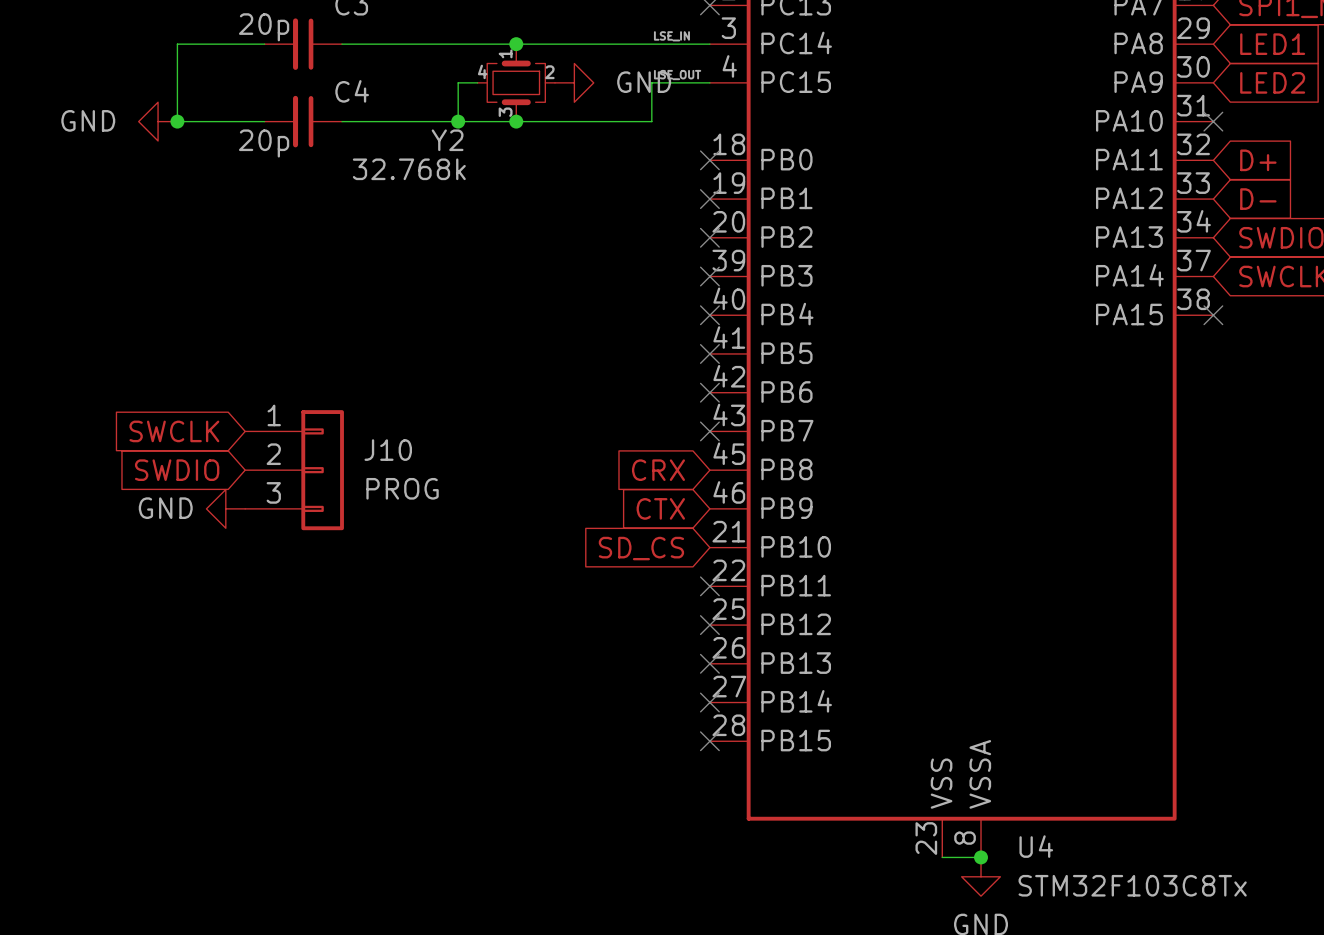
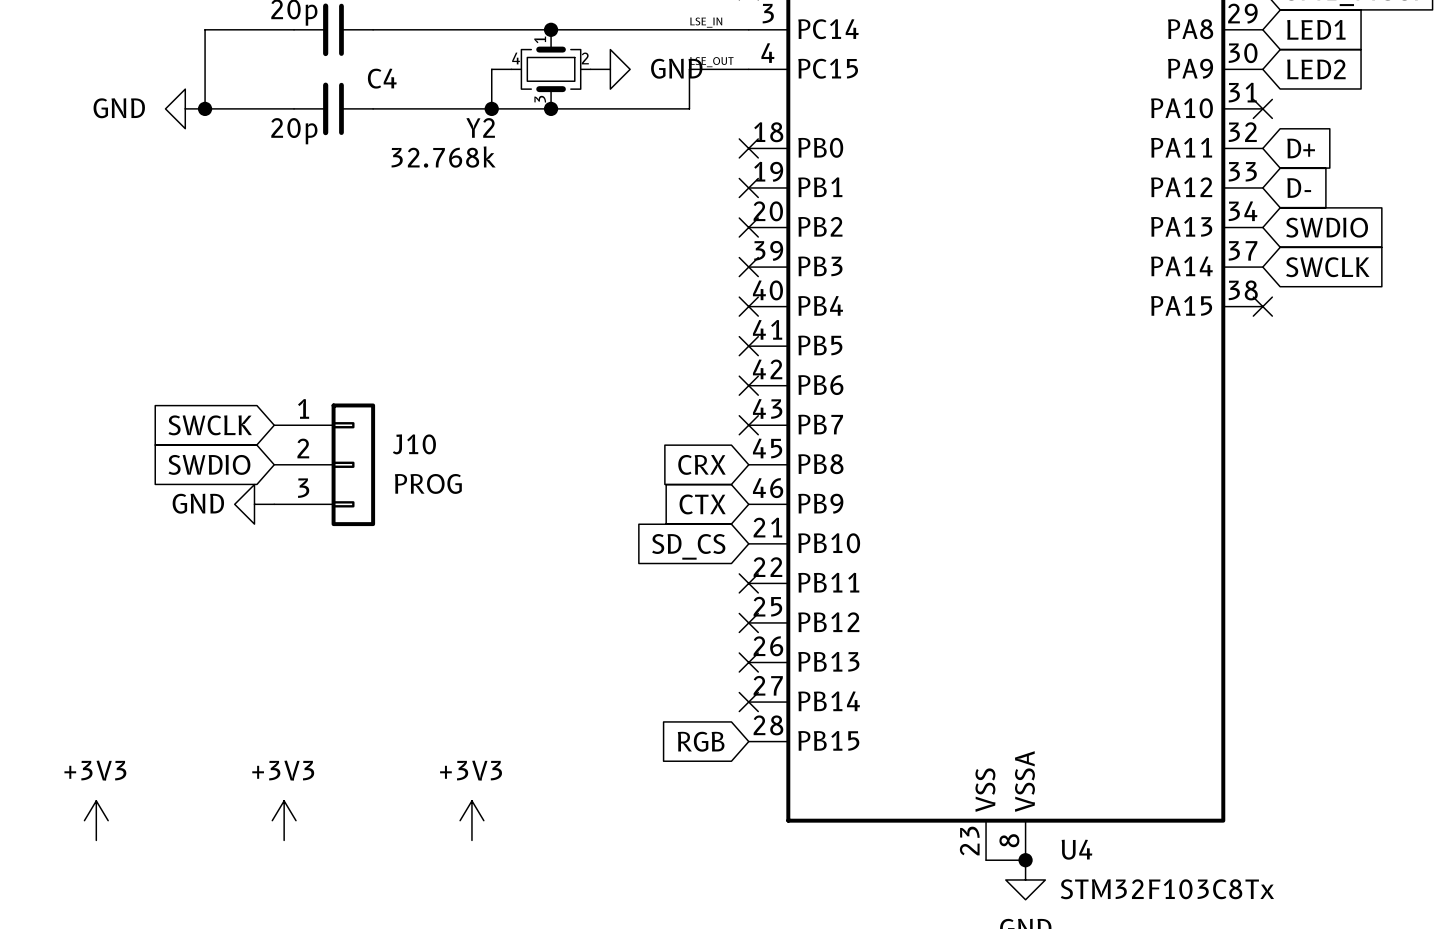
global label: none -> RGB (701, 741)
no-connect mark: (709, 741) -> none
power symbol: none -> +3V3 (96, 820)
power symbol: none -> +3V3 (284, 820)
power symbol: none -> +3V3 (471, 820)

